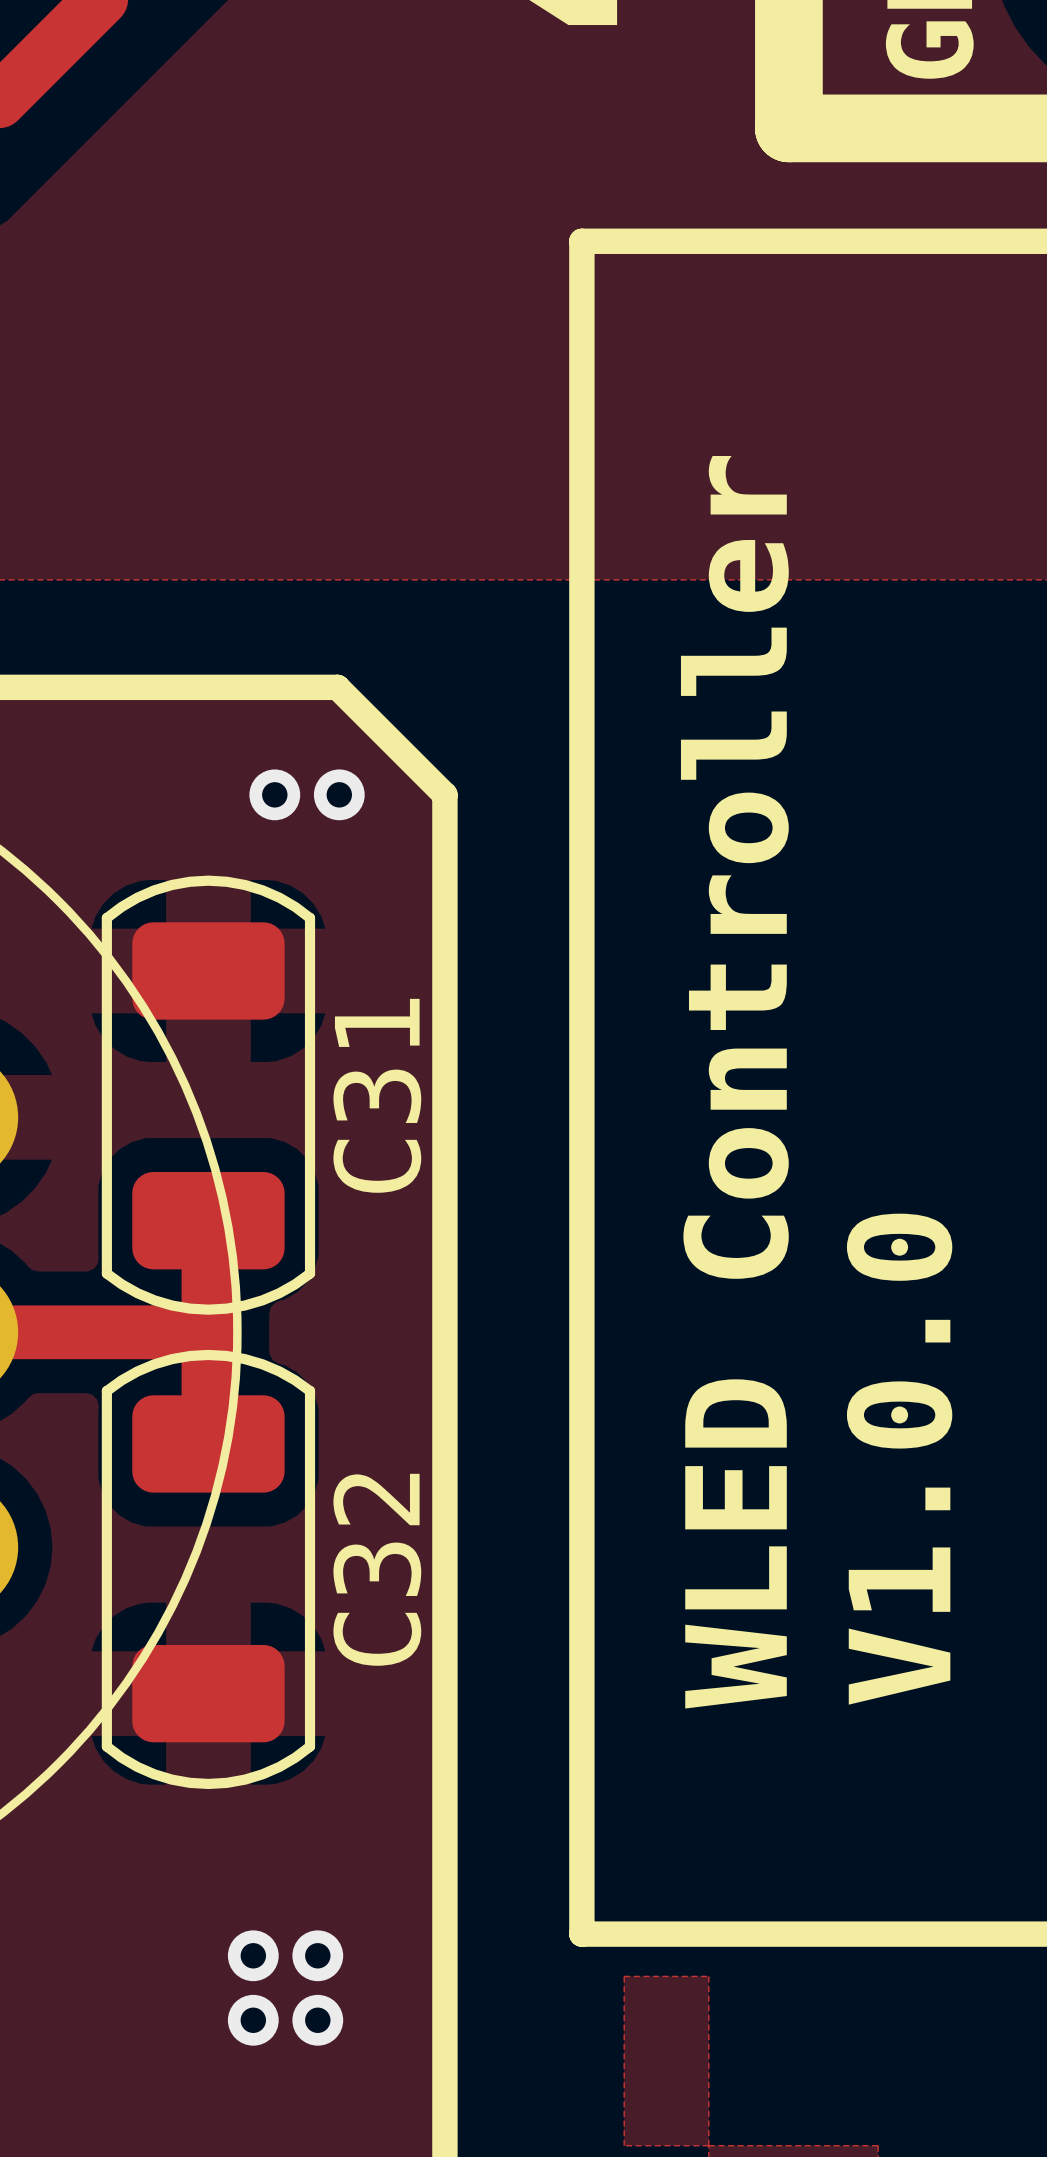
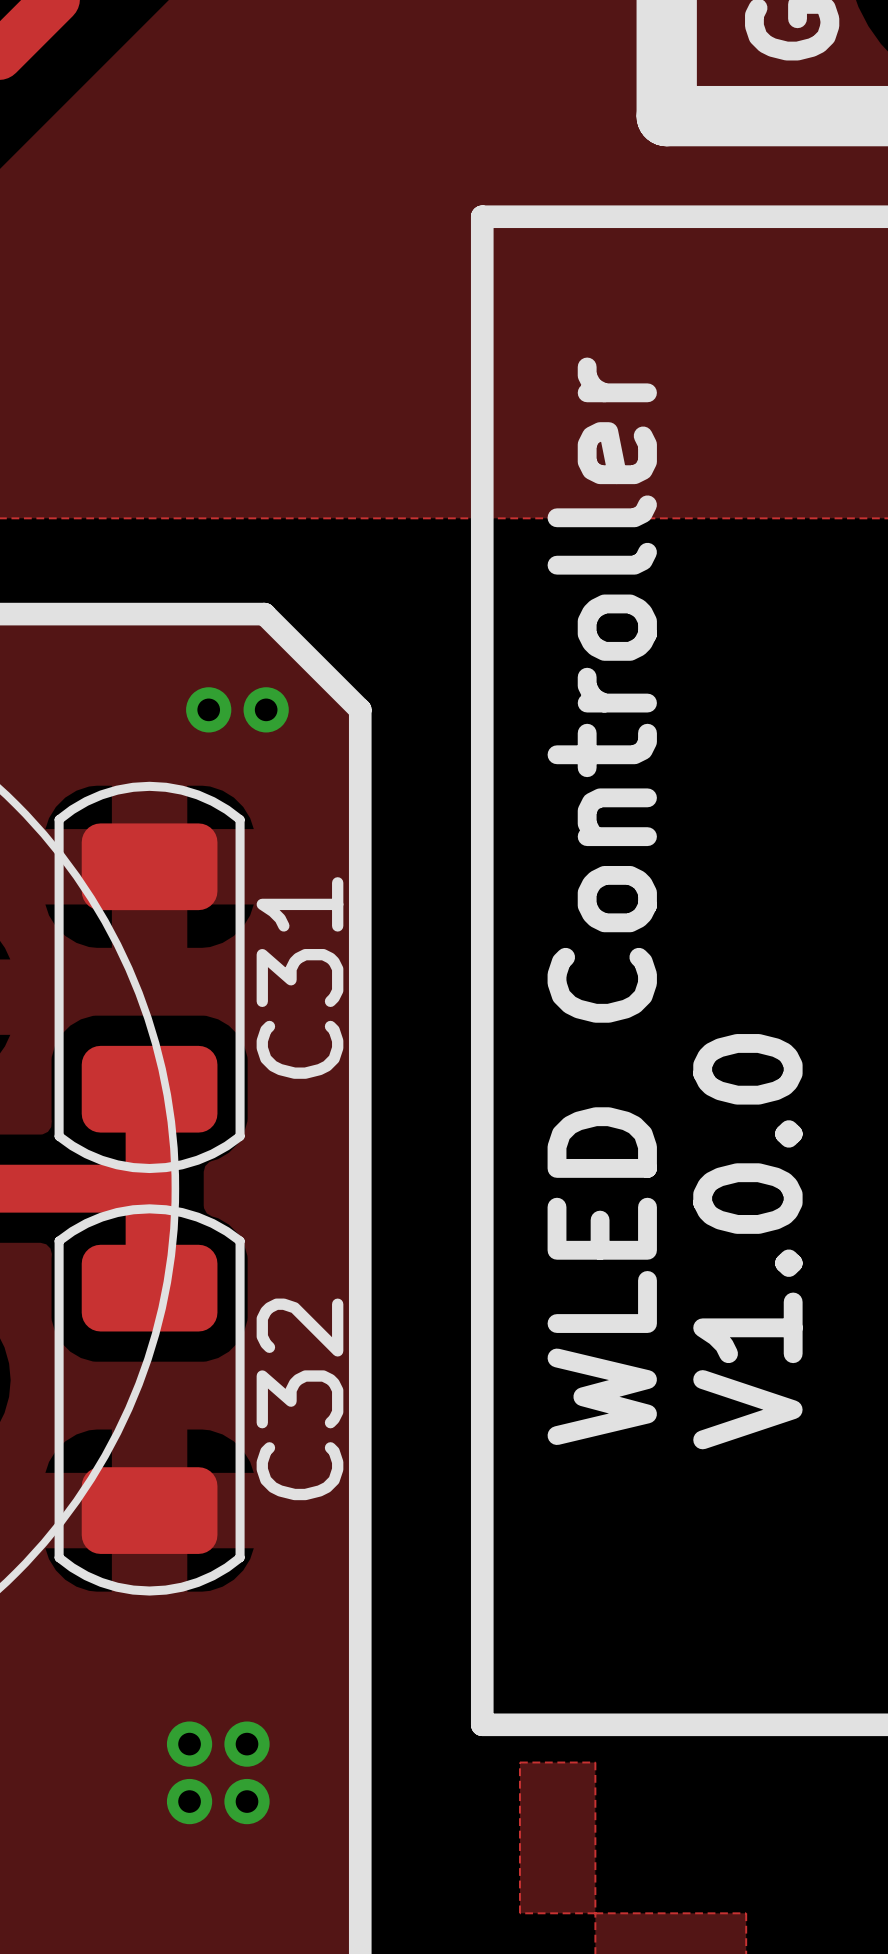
text position: WLED Controller (734, 1082) -> WLED Controller (602, 901)
text position: V1.0.0 (899, 1459) -> V1.0.0 (747, 1241)

